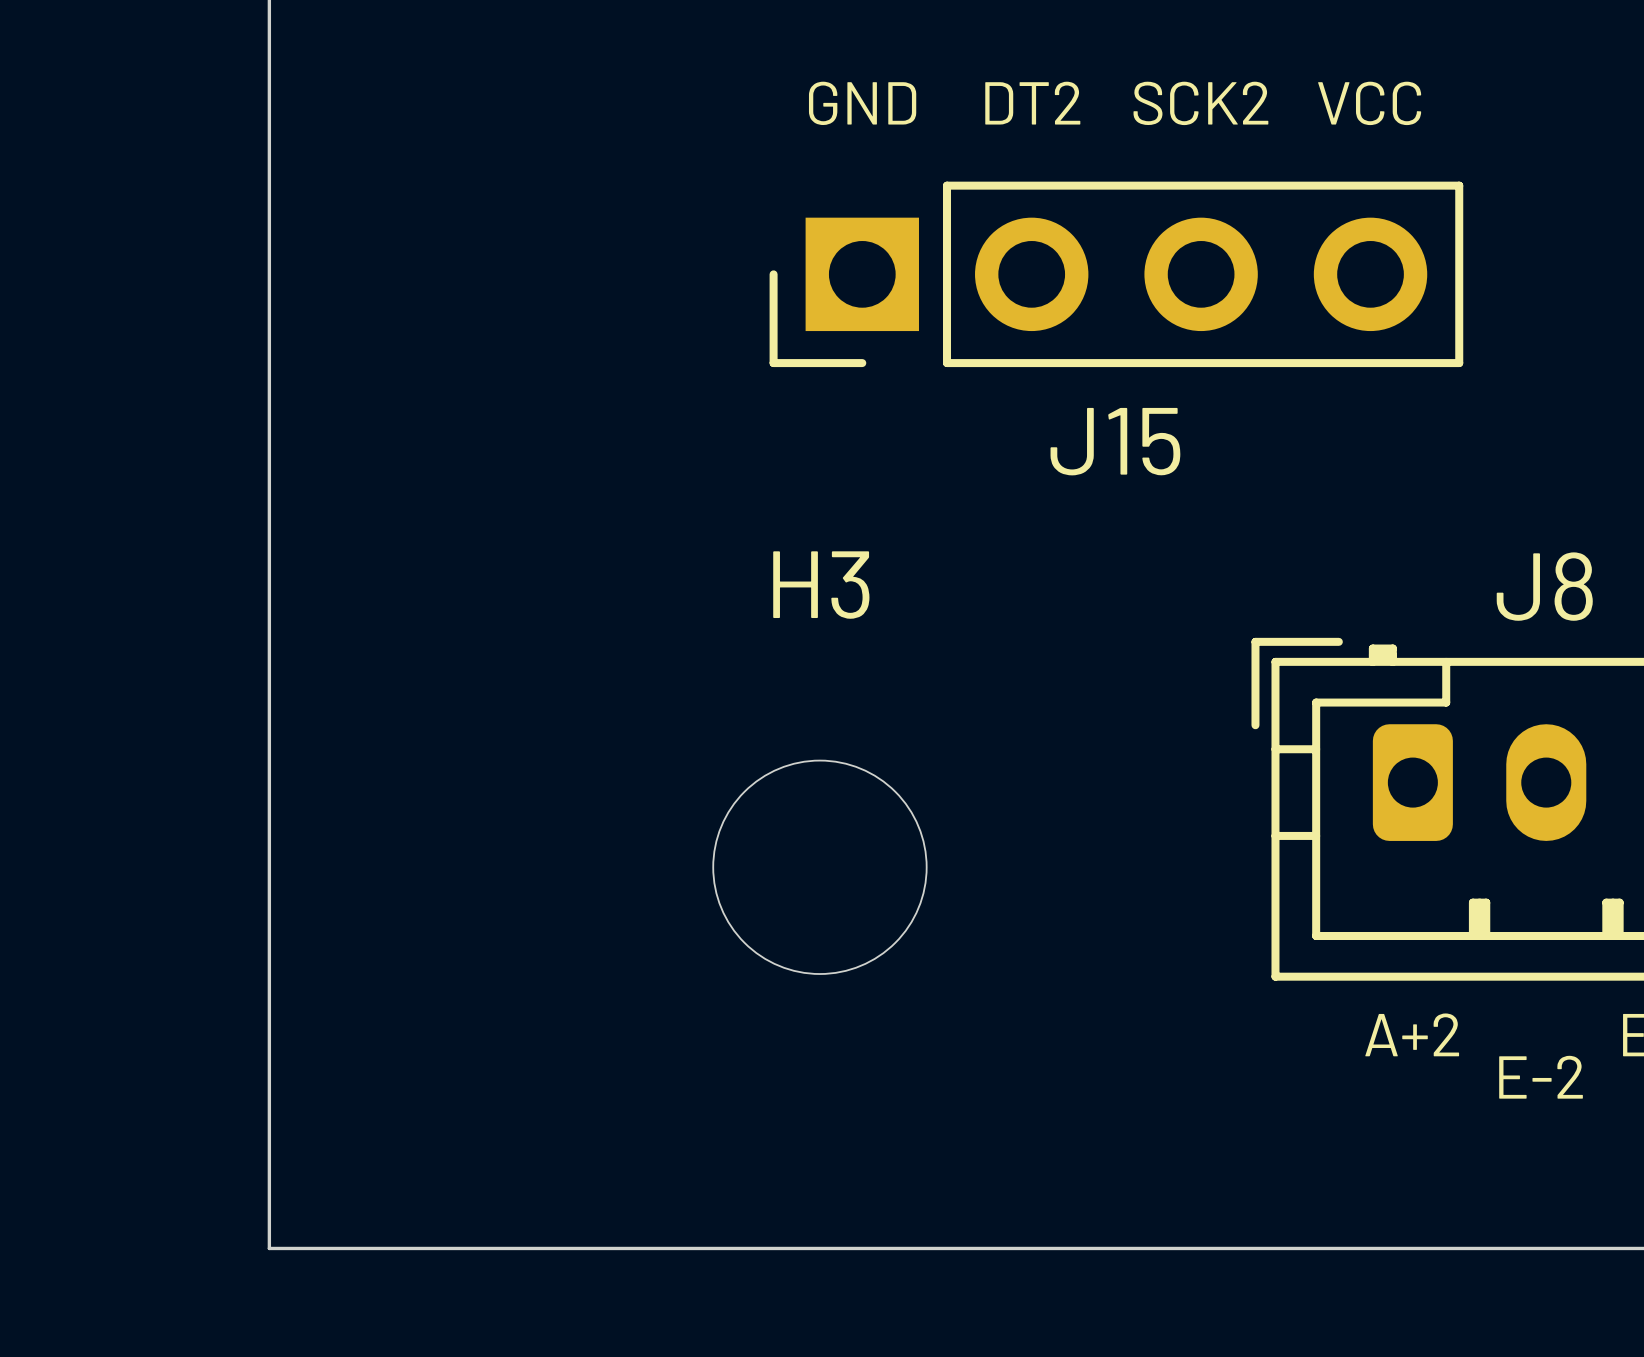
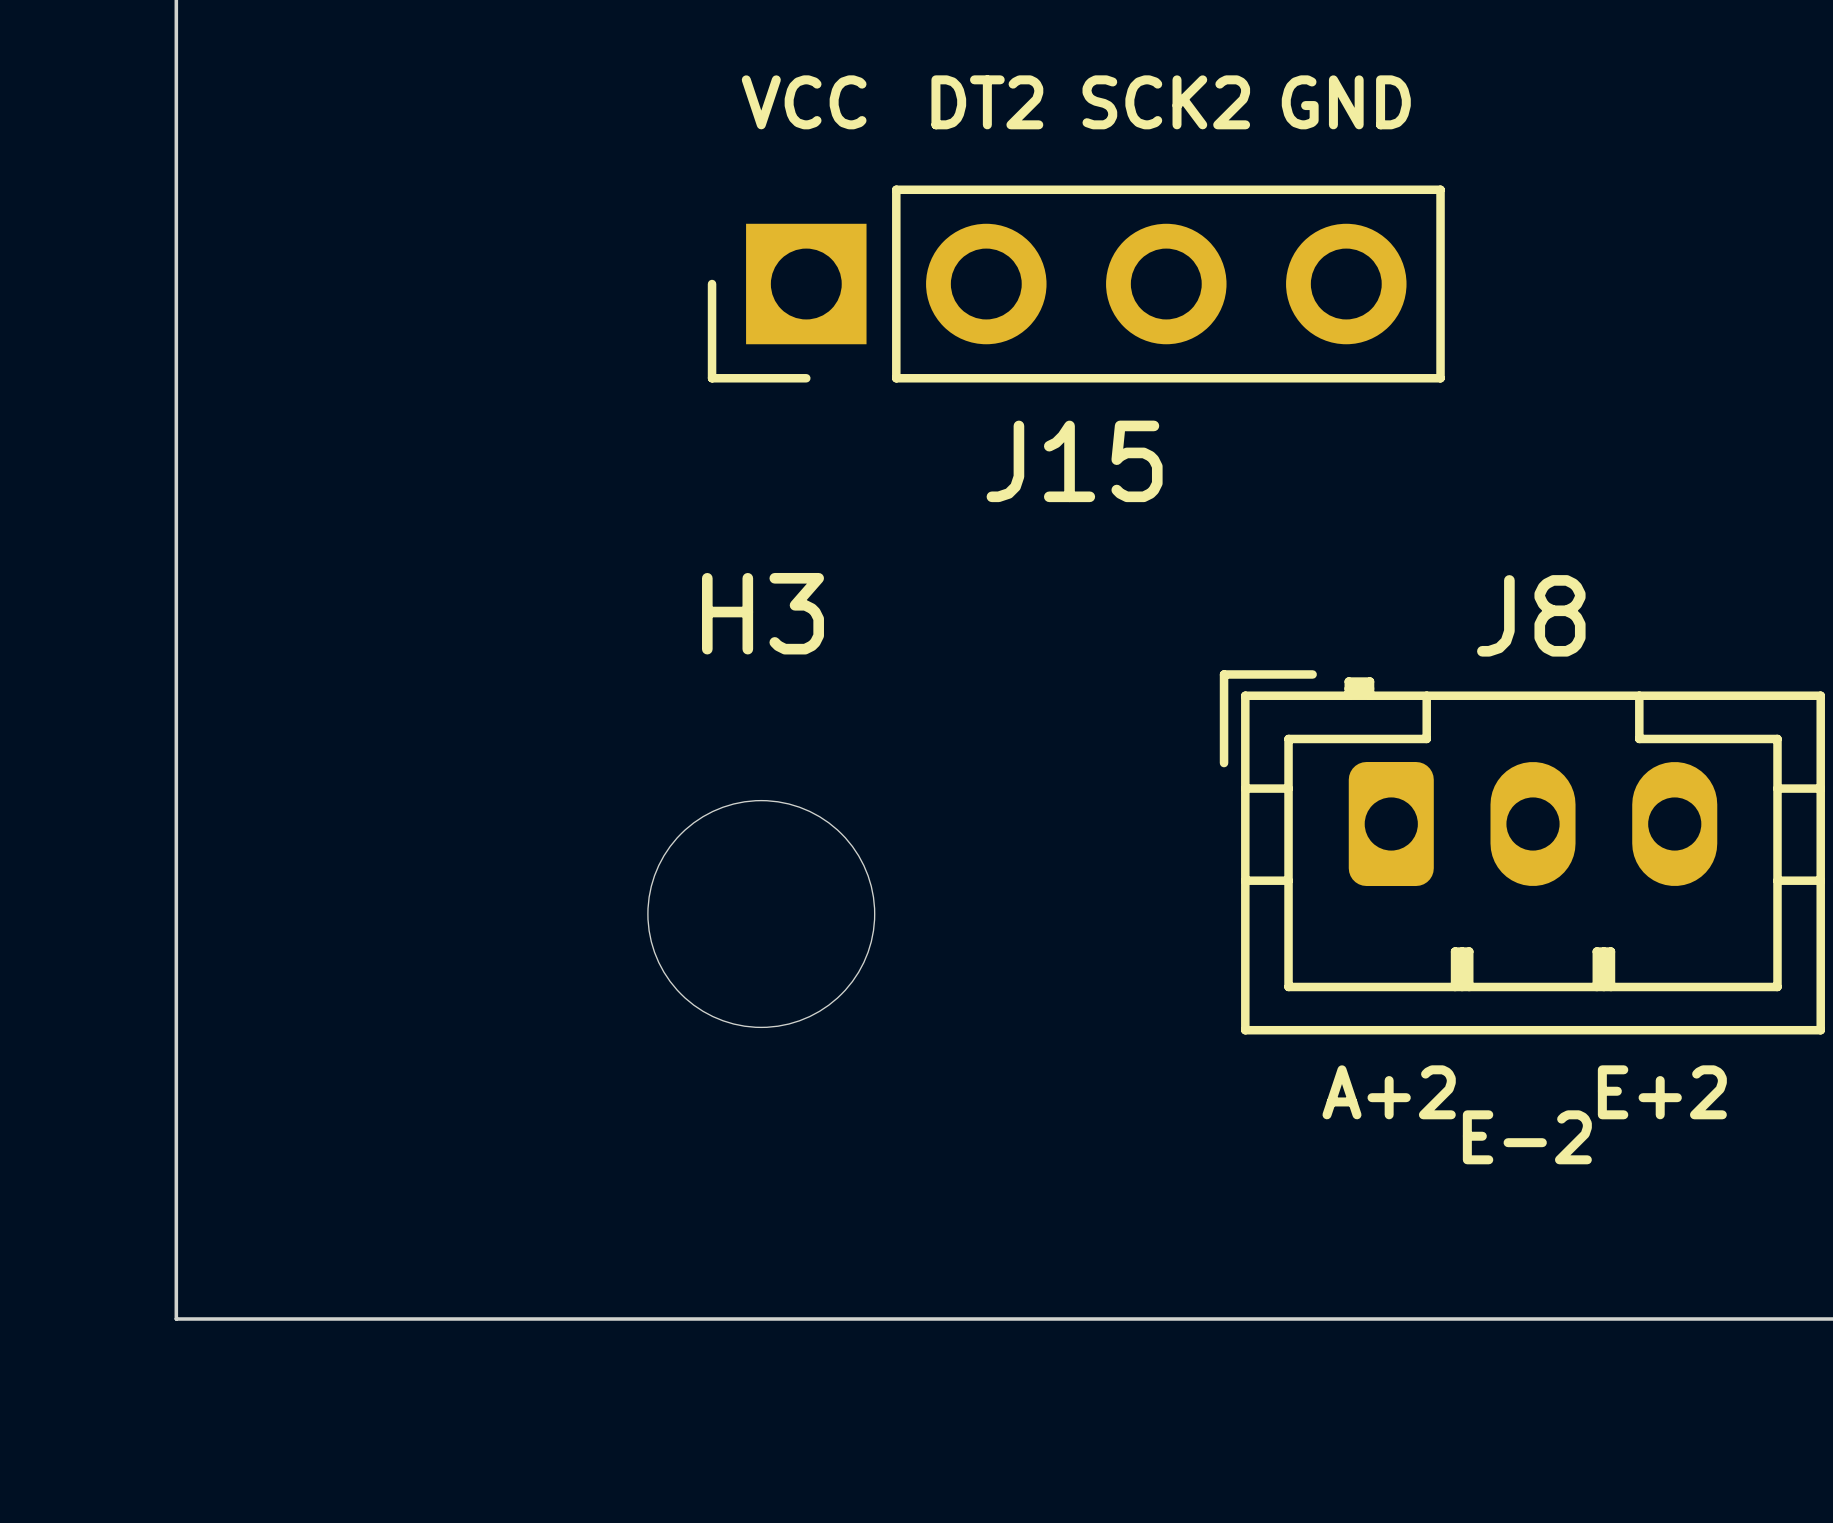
text: GND (862, 103) -> VCC (804, 102)
text: VCC (1369, 103) -> GND (1346, 102)

